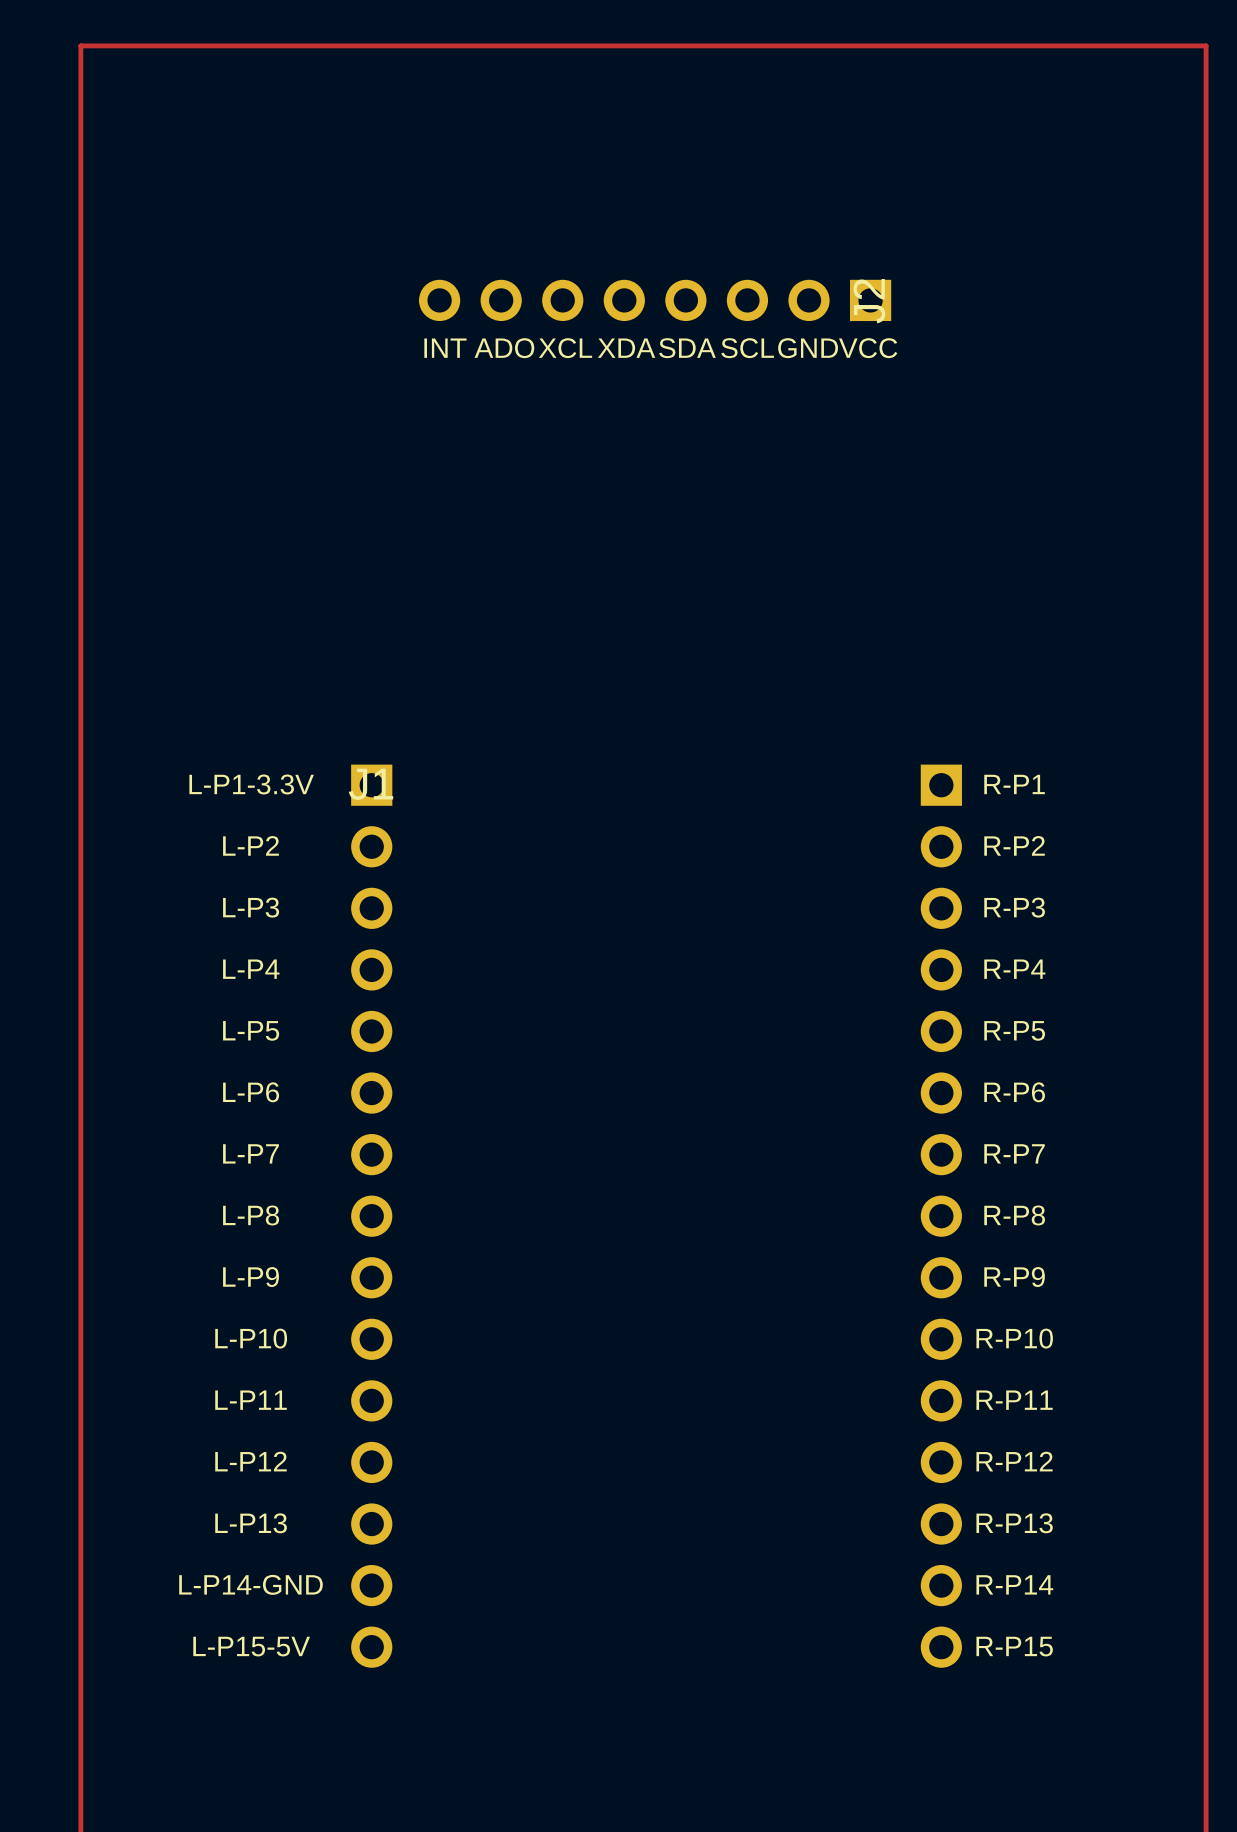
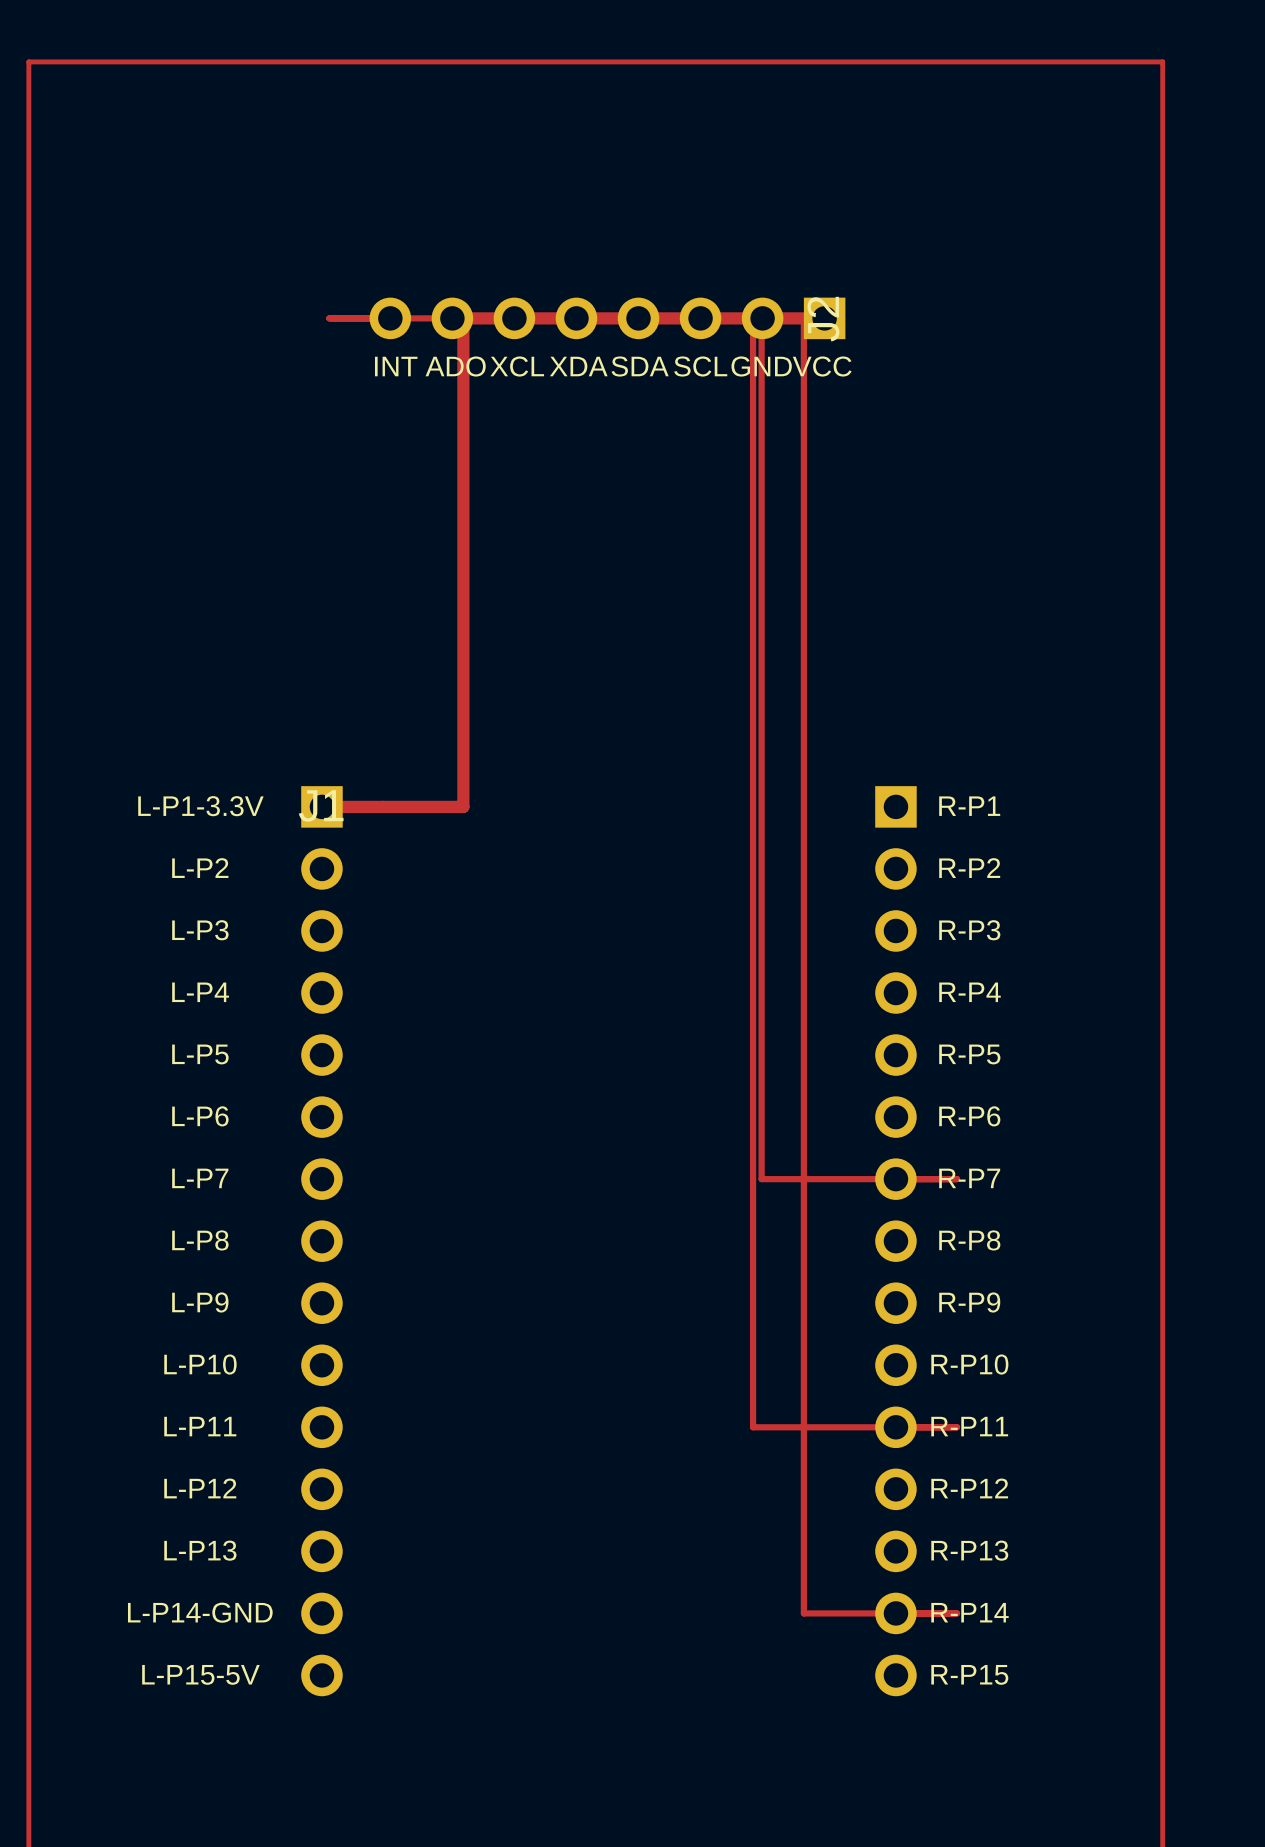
track: none -> (329, 318) (803, 318) (803, 1613) (957, 1613)
track: none -> (753, 318) (753, 1427) (957, 1427)
track: none -> (761, 318) (761, 1179) (957, 1179)
track: none -> (824, 318) (463, 318) (463, 806) (321, 806)

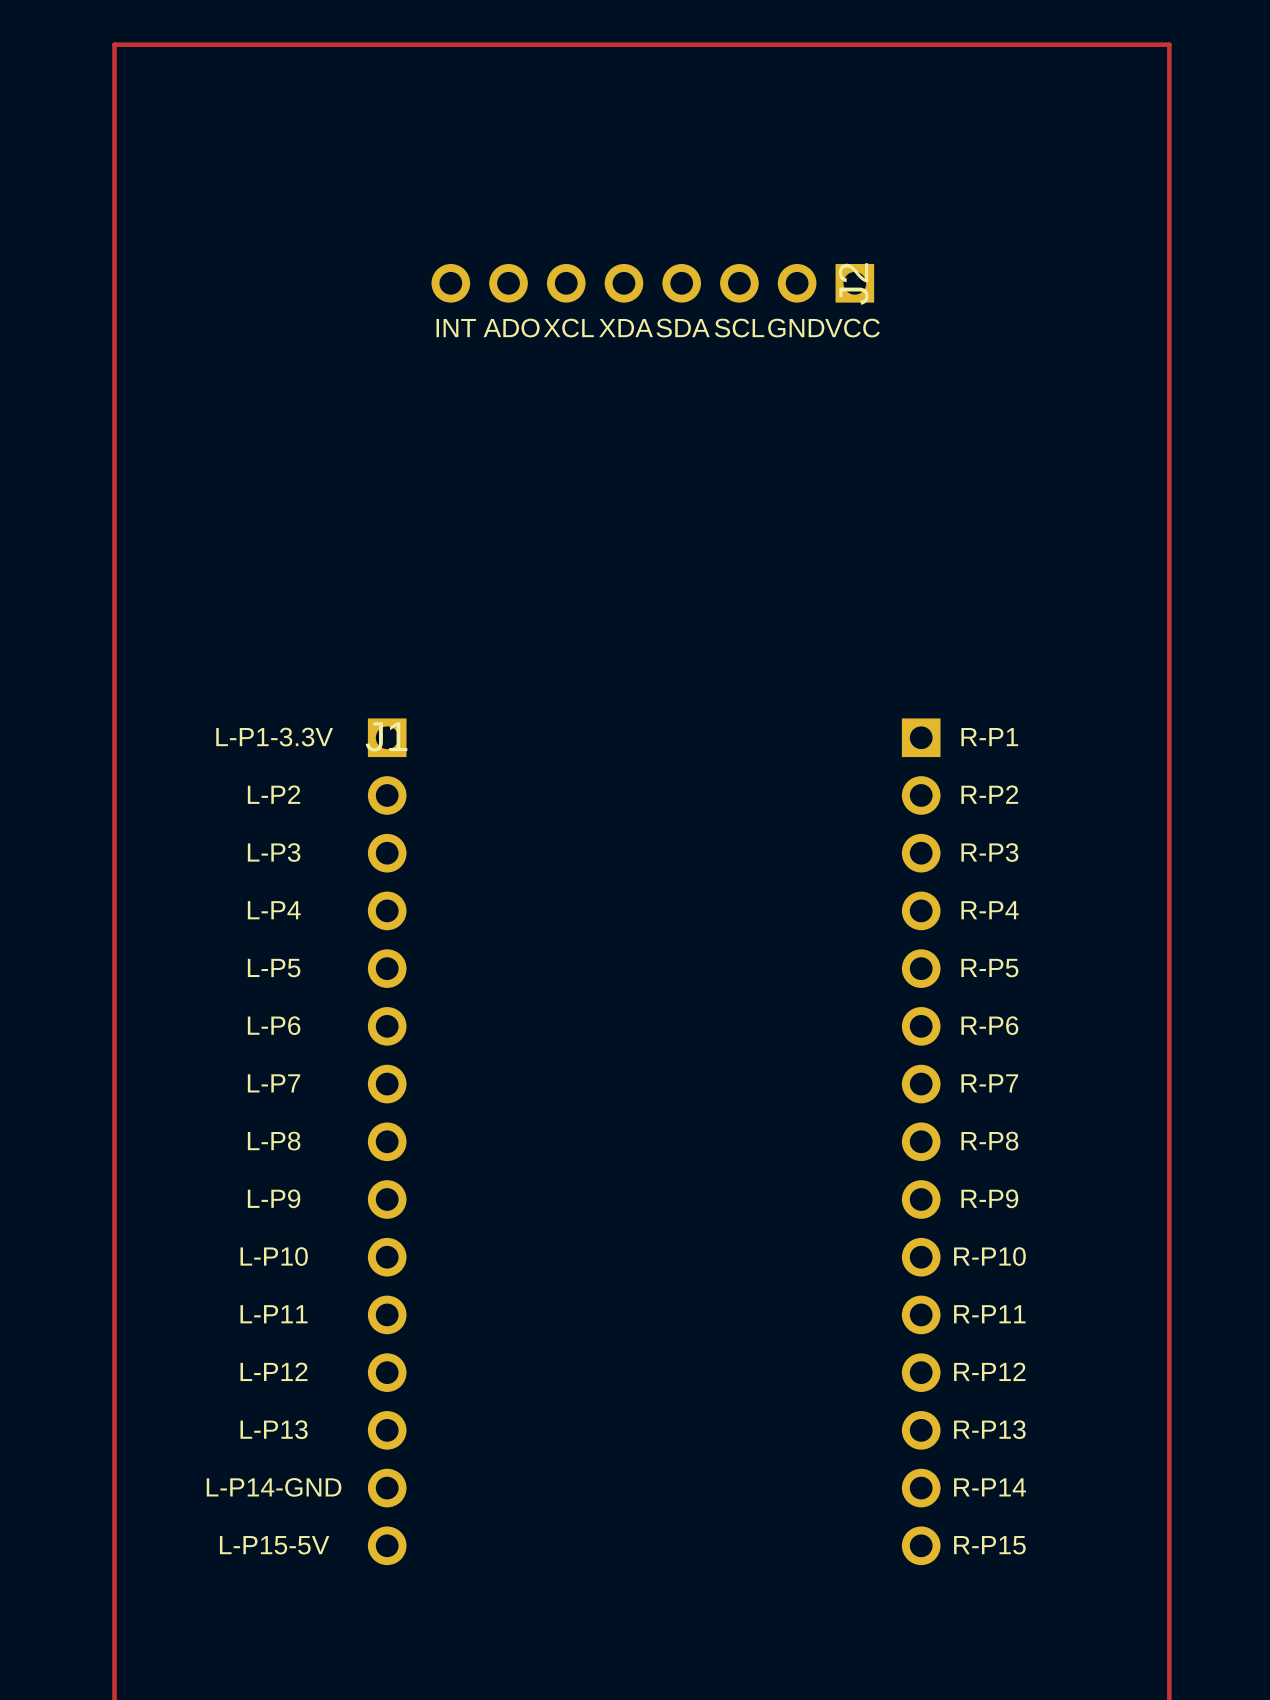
track: (329, 318) (803, 318) (803, 1613) (957, 1613) -> none
track: (753, 318) (753, 1427) (957, 1427) -> none
track: (761, 318) (761, 1179) (957, 1179) -> none
track: (824, 318) (463, 318) (463, 806) (321, 806) -> none

